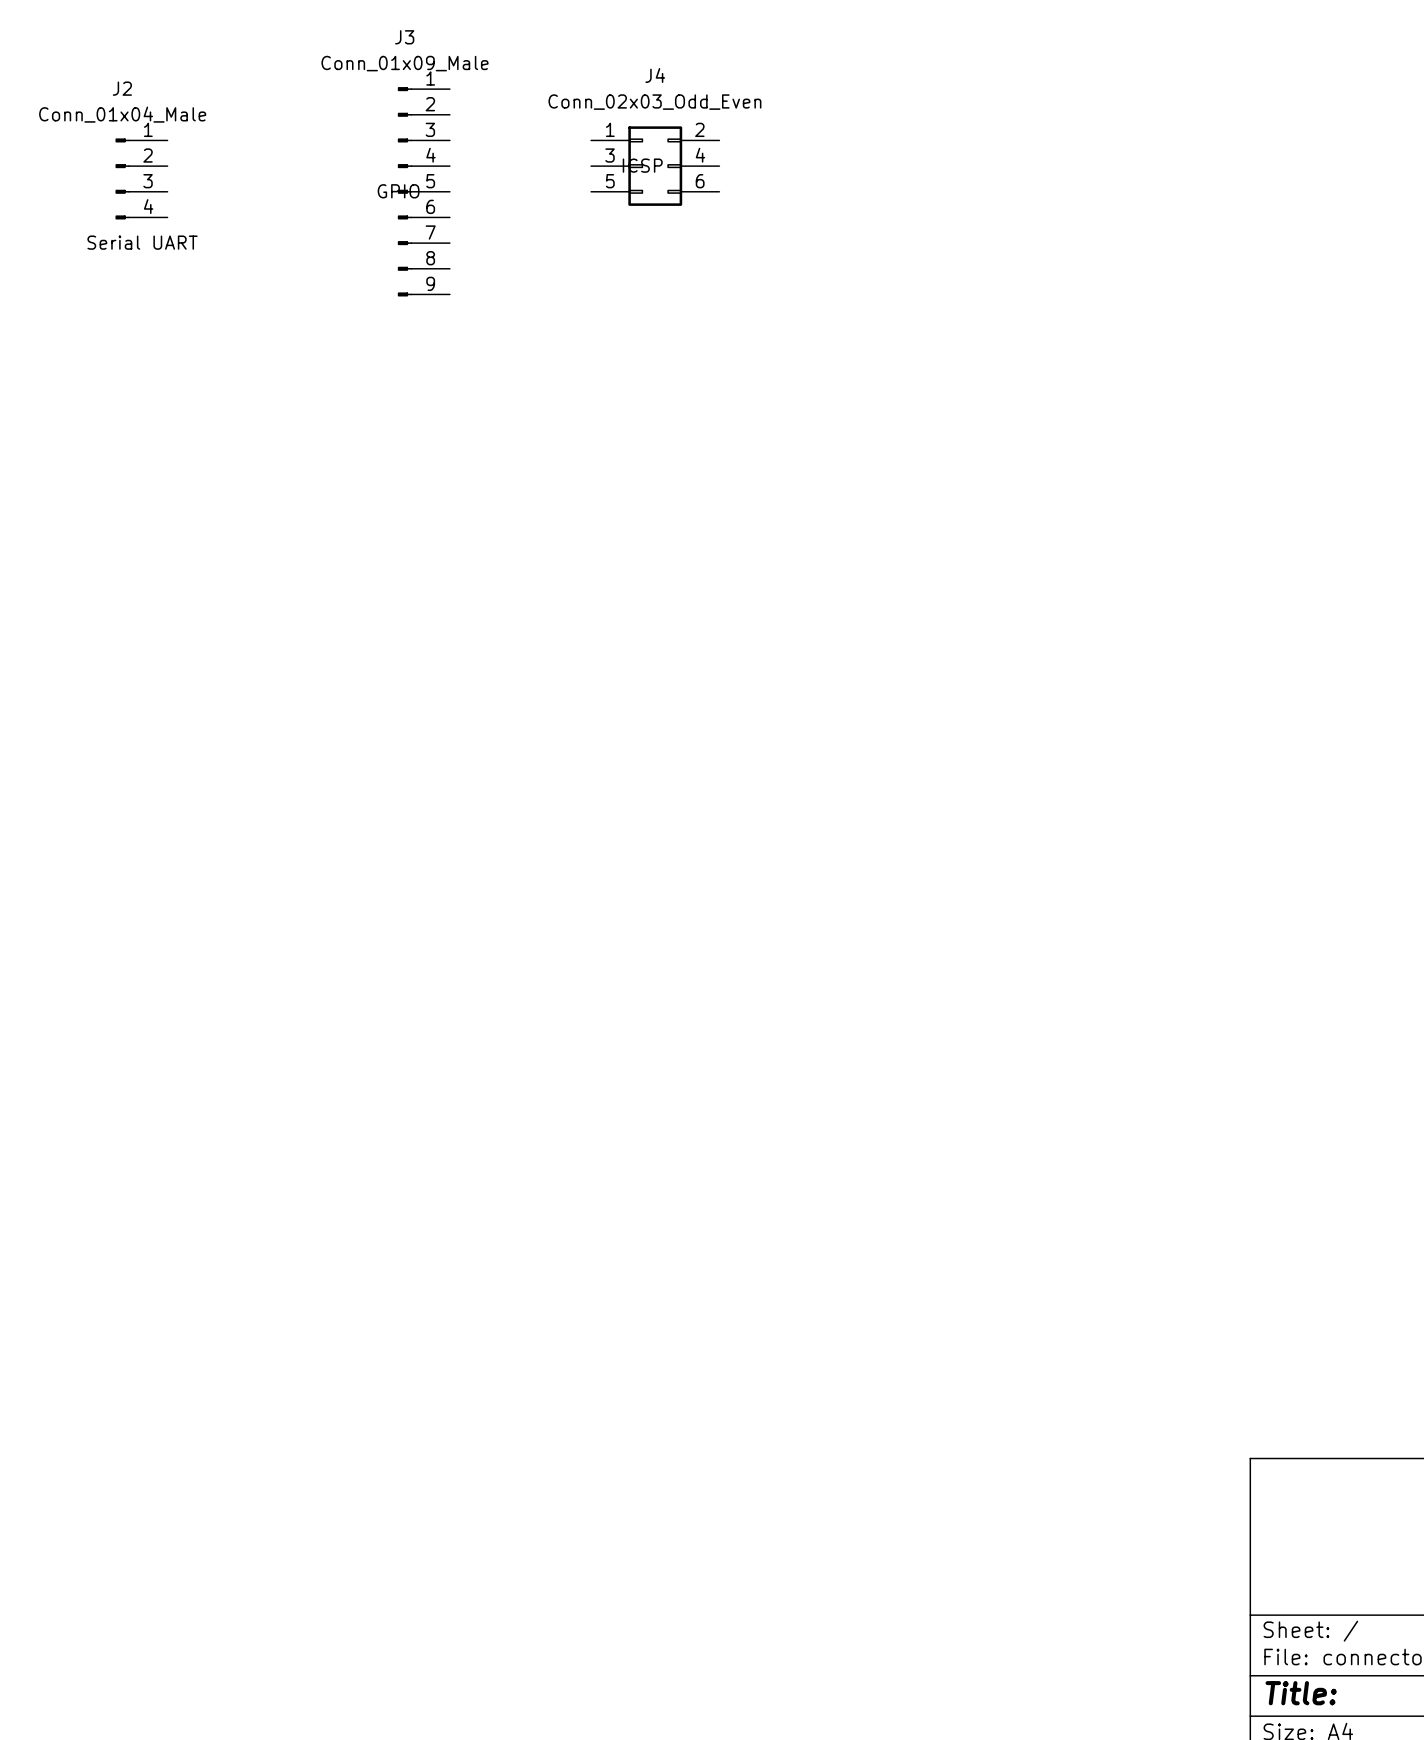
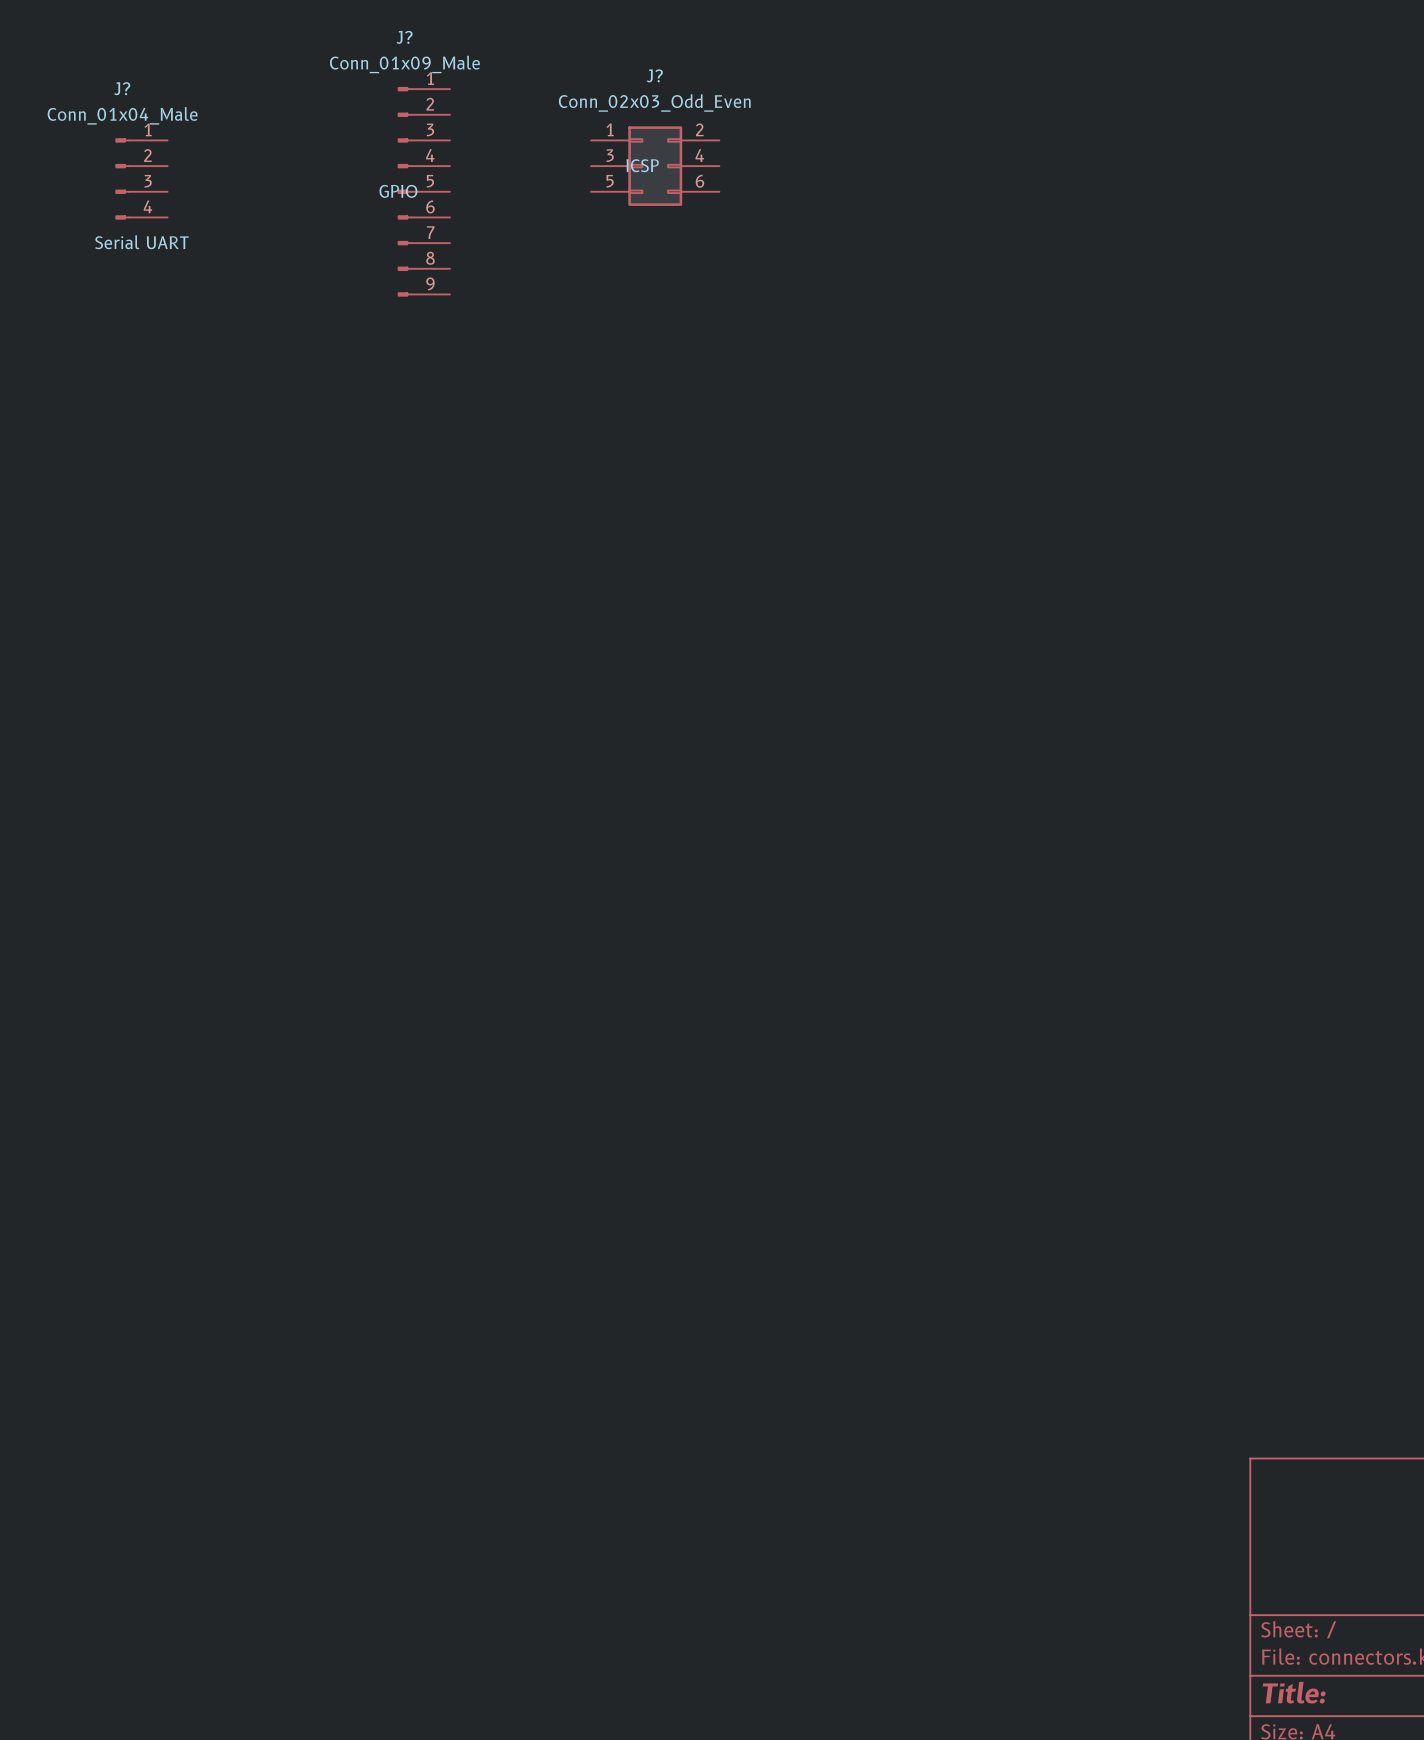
J3 name: J3 (404, 37) -> J? (404, 37)
J4 name: J4 (655, 75) -> J? (654, 75)
J2 name: J2 (122, 88) -> J? (122, 88)

